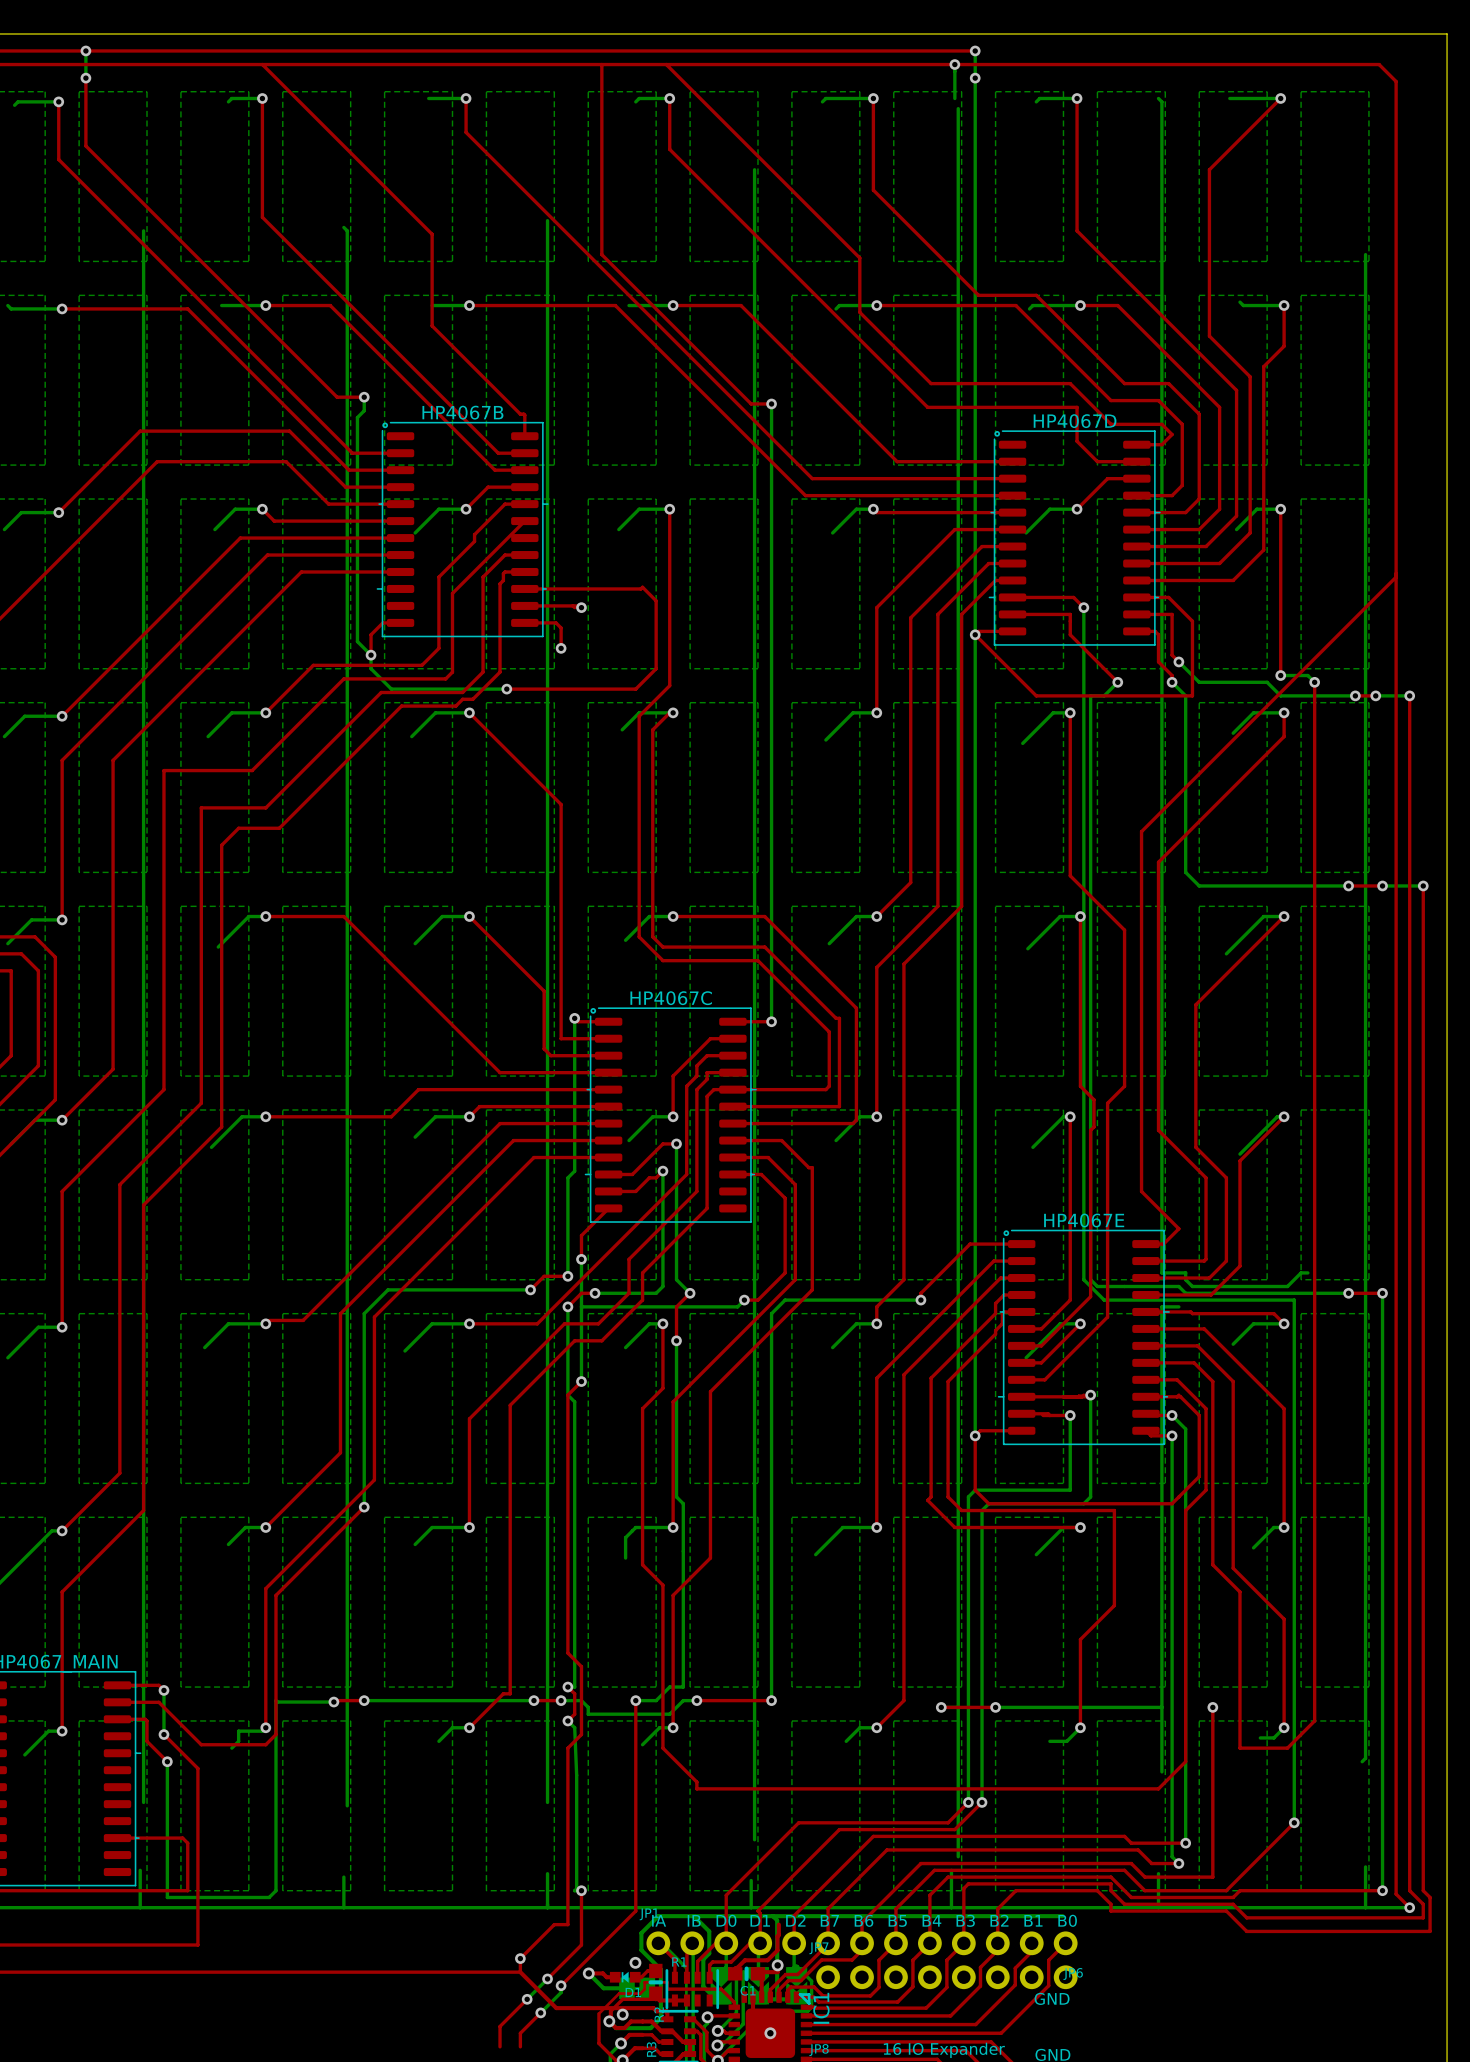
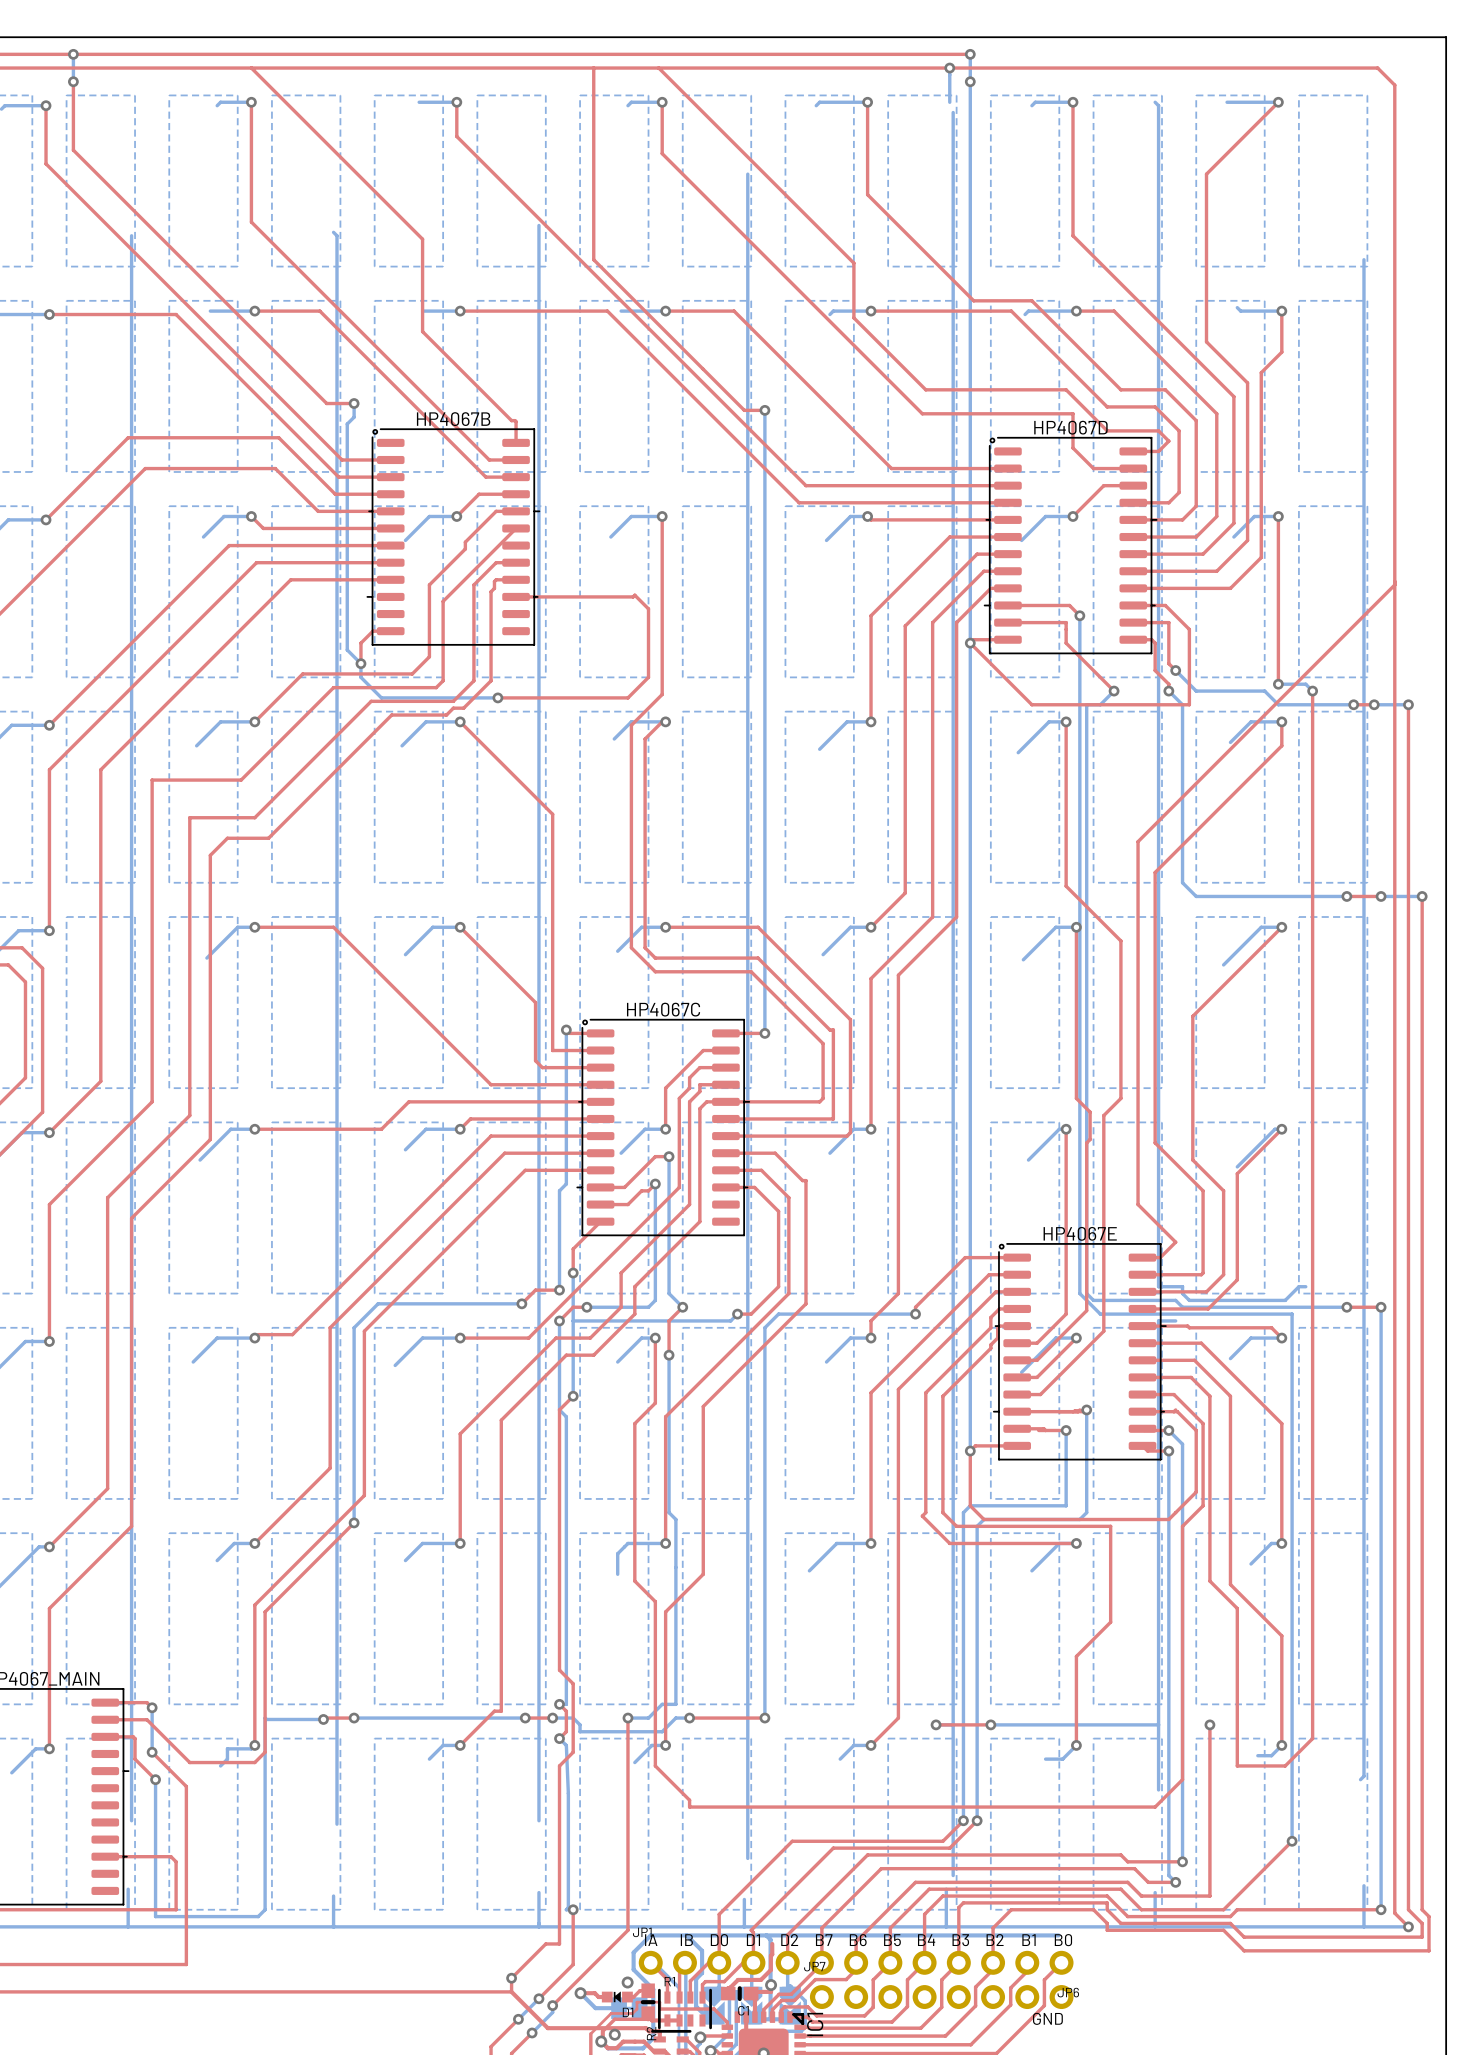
top track: (524, 605) (579, 605) (581, 607) -> none
top track: (572, 605) (574, 607) -> none
via: (581, 607) -> none
top track: (524, 622) (556, 622) (561, 628) (561, 648) -> none
via: (561, 648) -> none

